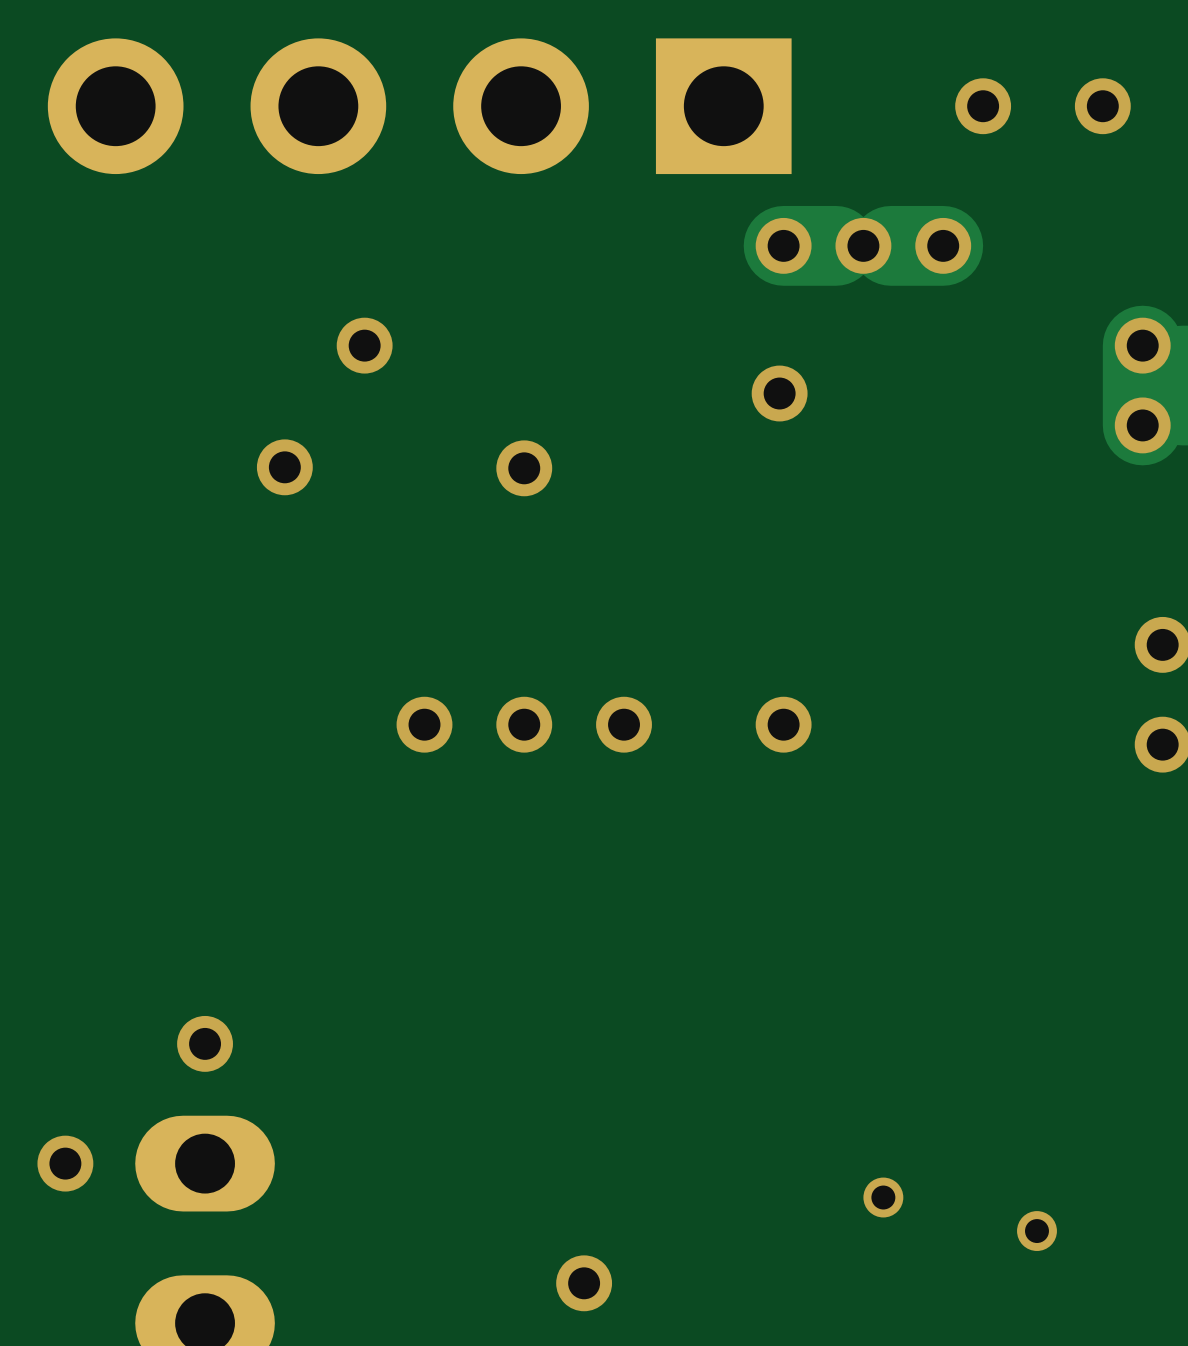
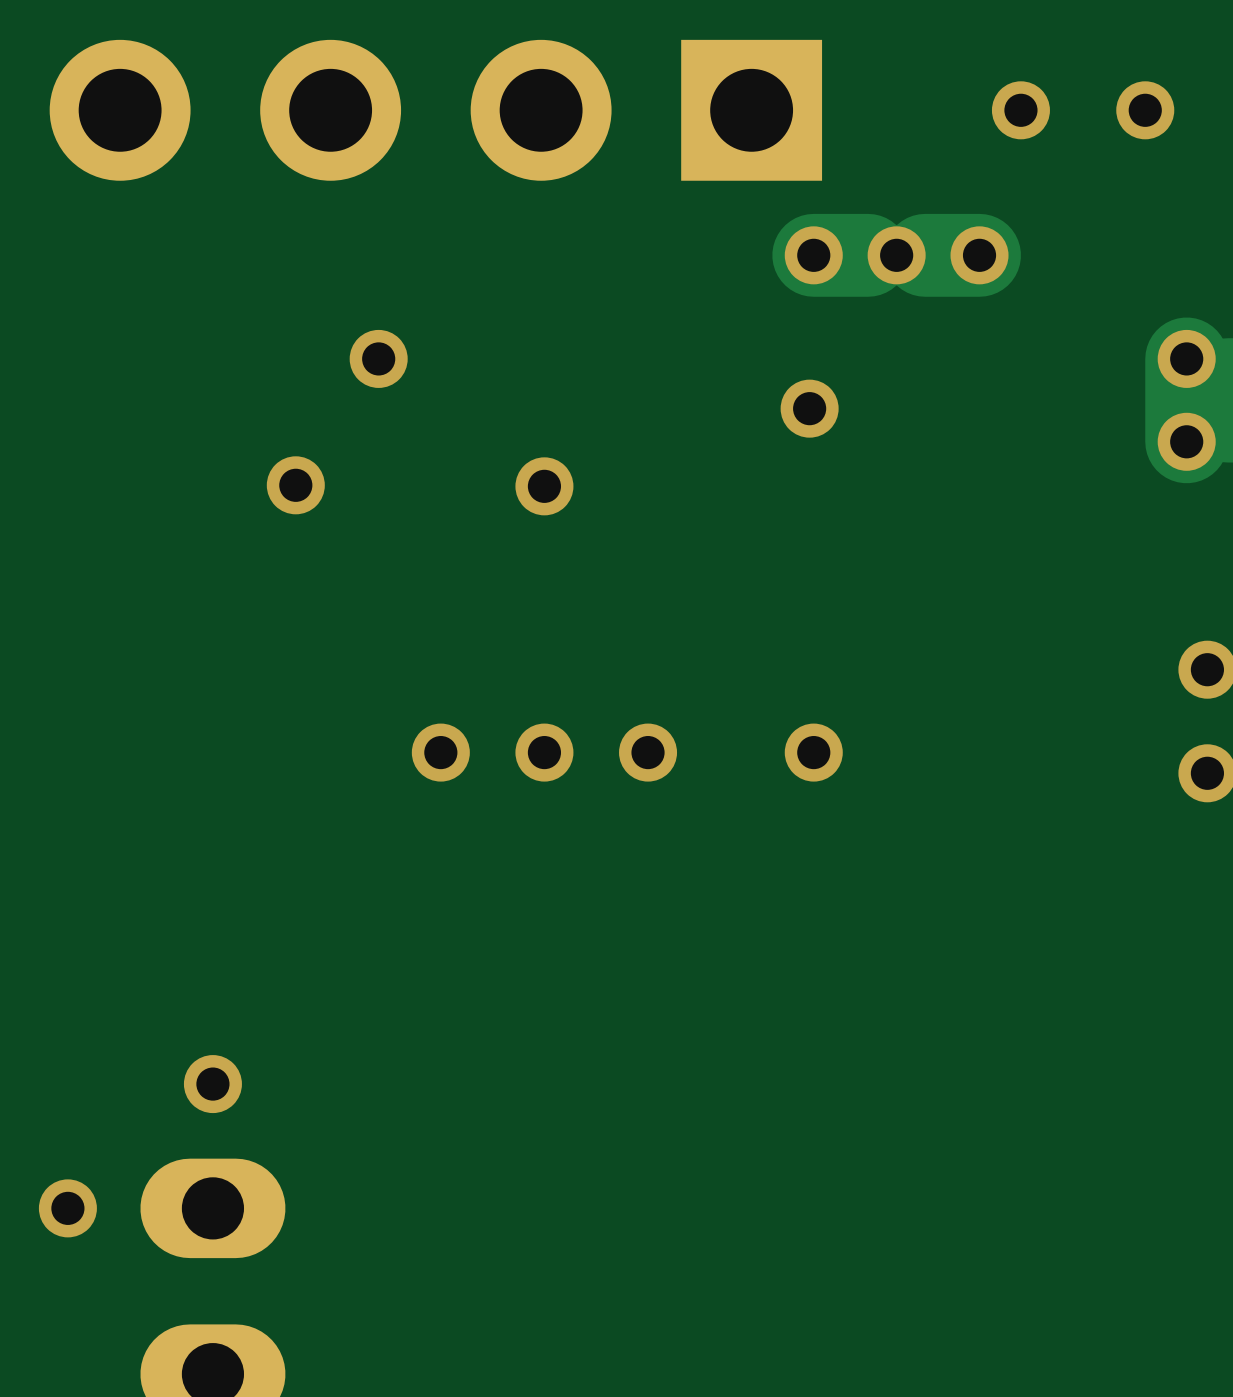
via: (883, 1197) -> none
via: (1036, 1231) -> none
via: (584, 1283) -> none

